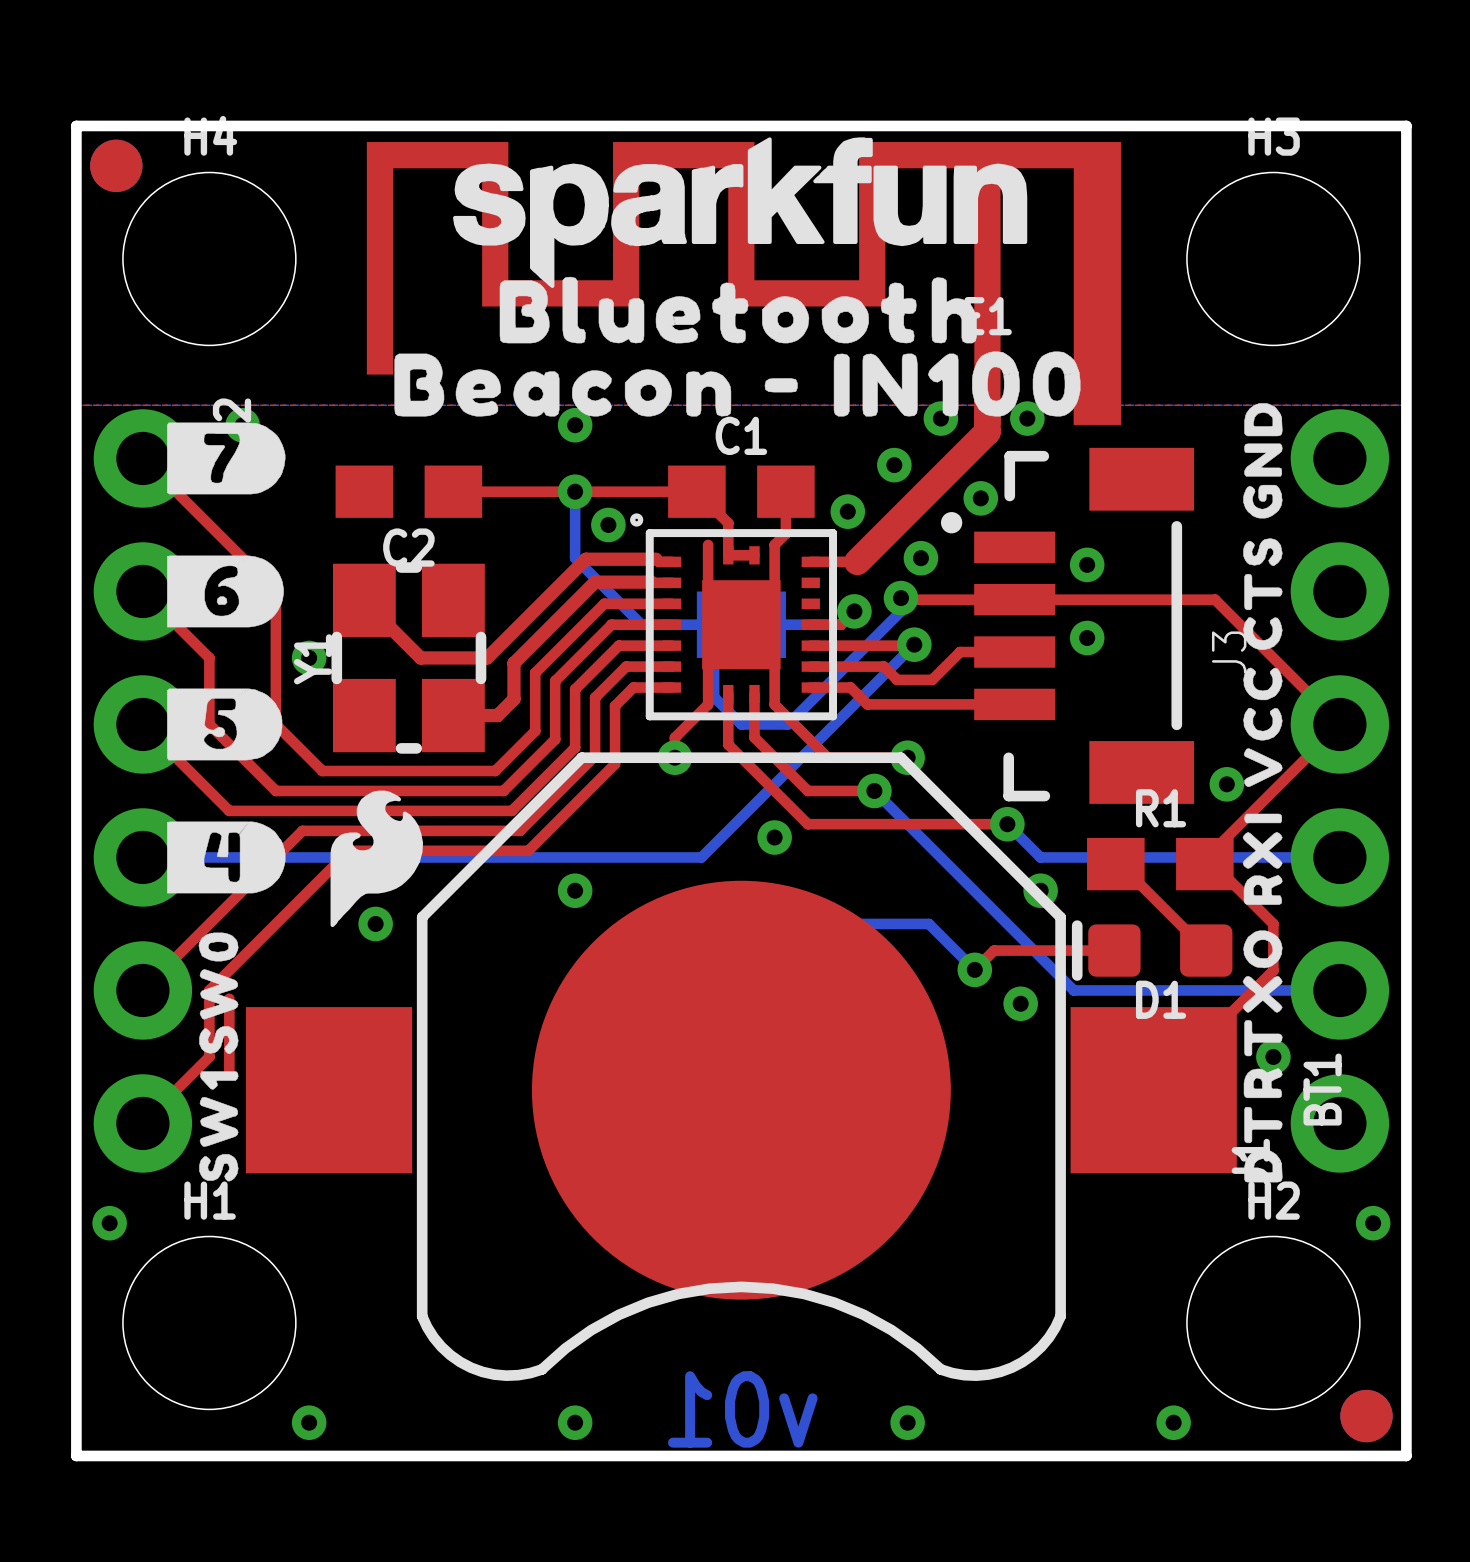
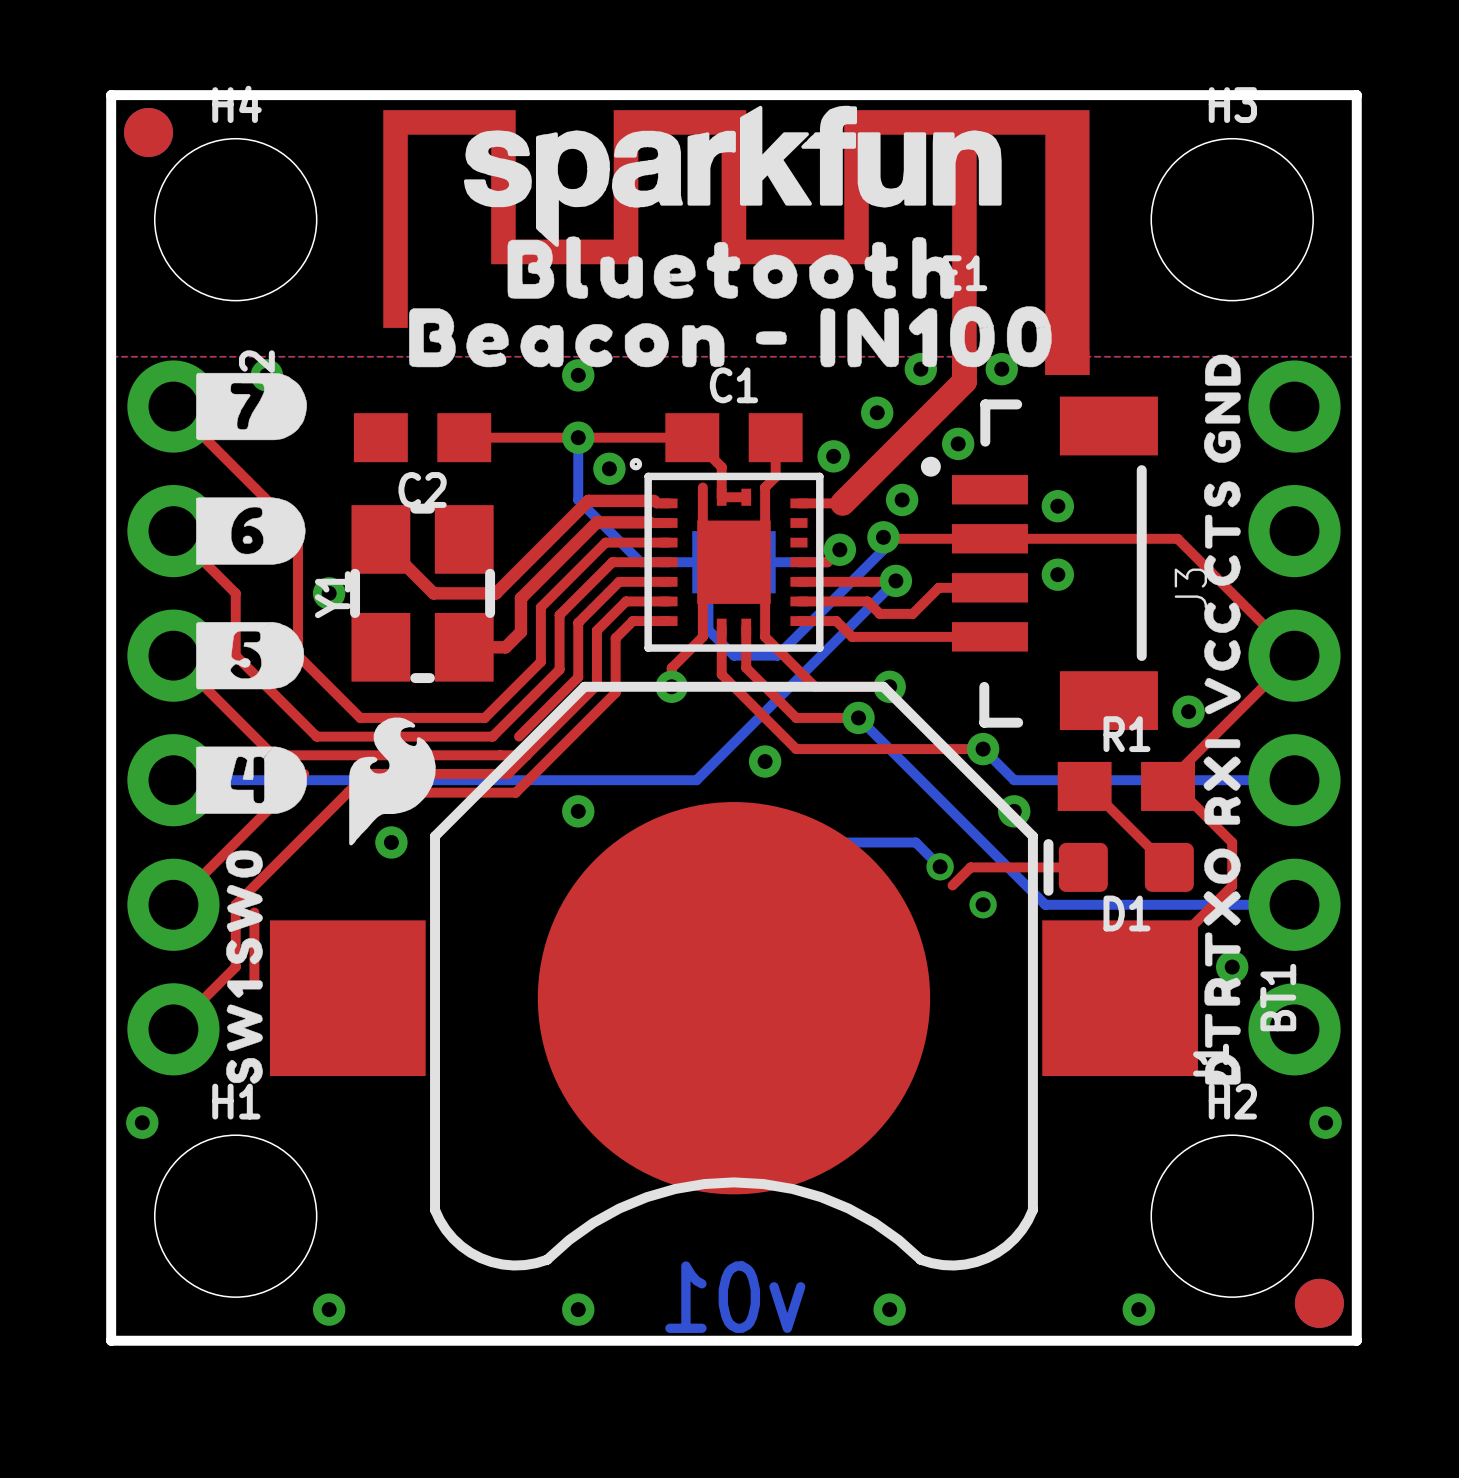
top track: (322, 771) (495, 771) -> (341, 699) (360, 717)
top track: (275, 790) (342, 790) -> (298, 717) (316, 736)
top track: (475, 790) (503, 790) -> (492, 736) (511, 717)
top track: (229, 810) (295, 810) -> (254, 736) (273, 755) (322, 755)
top track: (483, 810) (511, 810) -> none
top track: (302, 830) (282, 850) -> (503, 699) (484, 717)
top track: (500, 850) (528, 850) -> (508, 773) (526, 755)
top track: none -> (534, 773) (515, 792) (347, 792)
bottom track: (928, 923) (974, 969) -> (909, 842) (915, 842) (940, 866)
via position: (974, 969) -> (940, 866)
via position: (1020, 1003) -> (983, 904)

